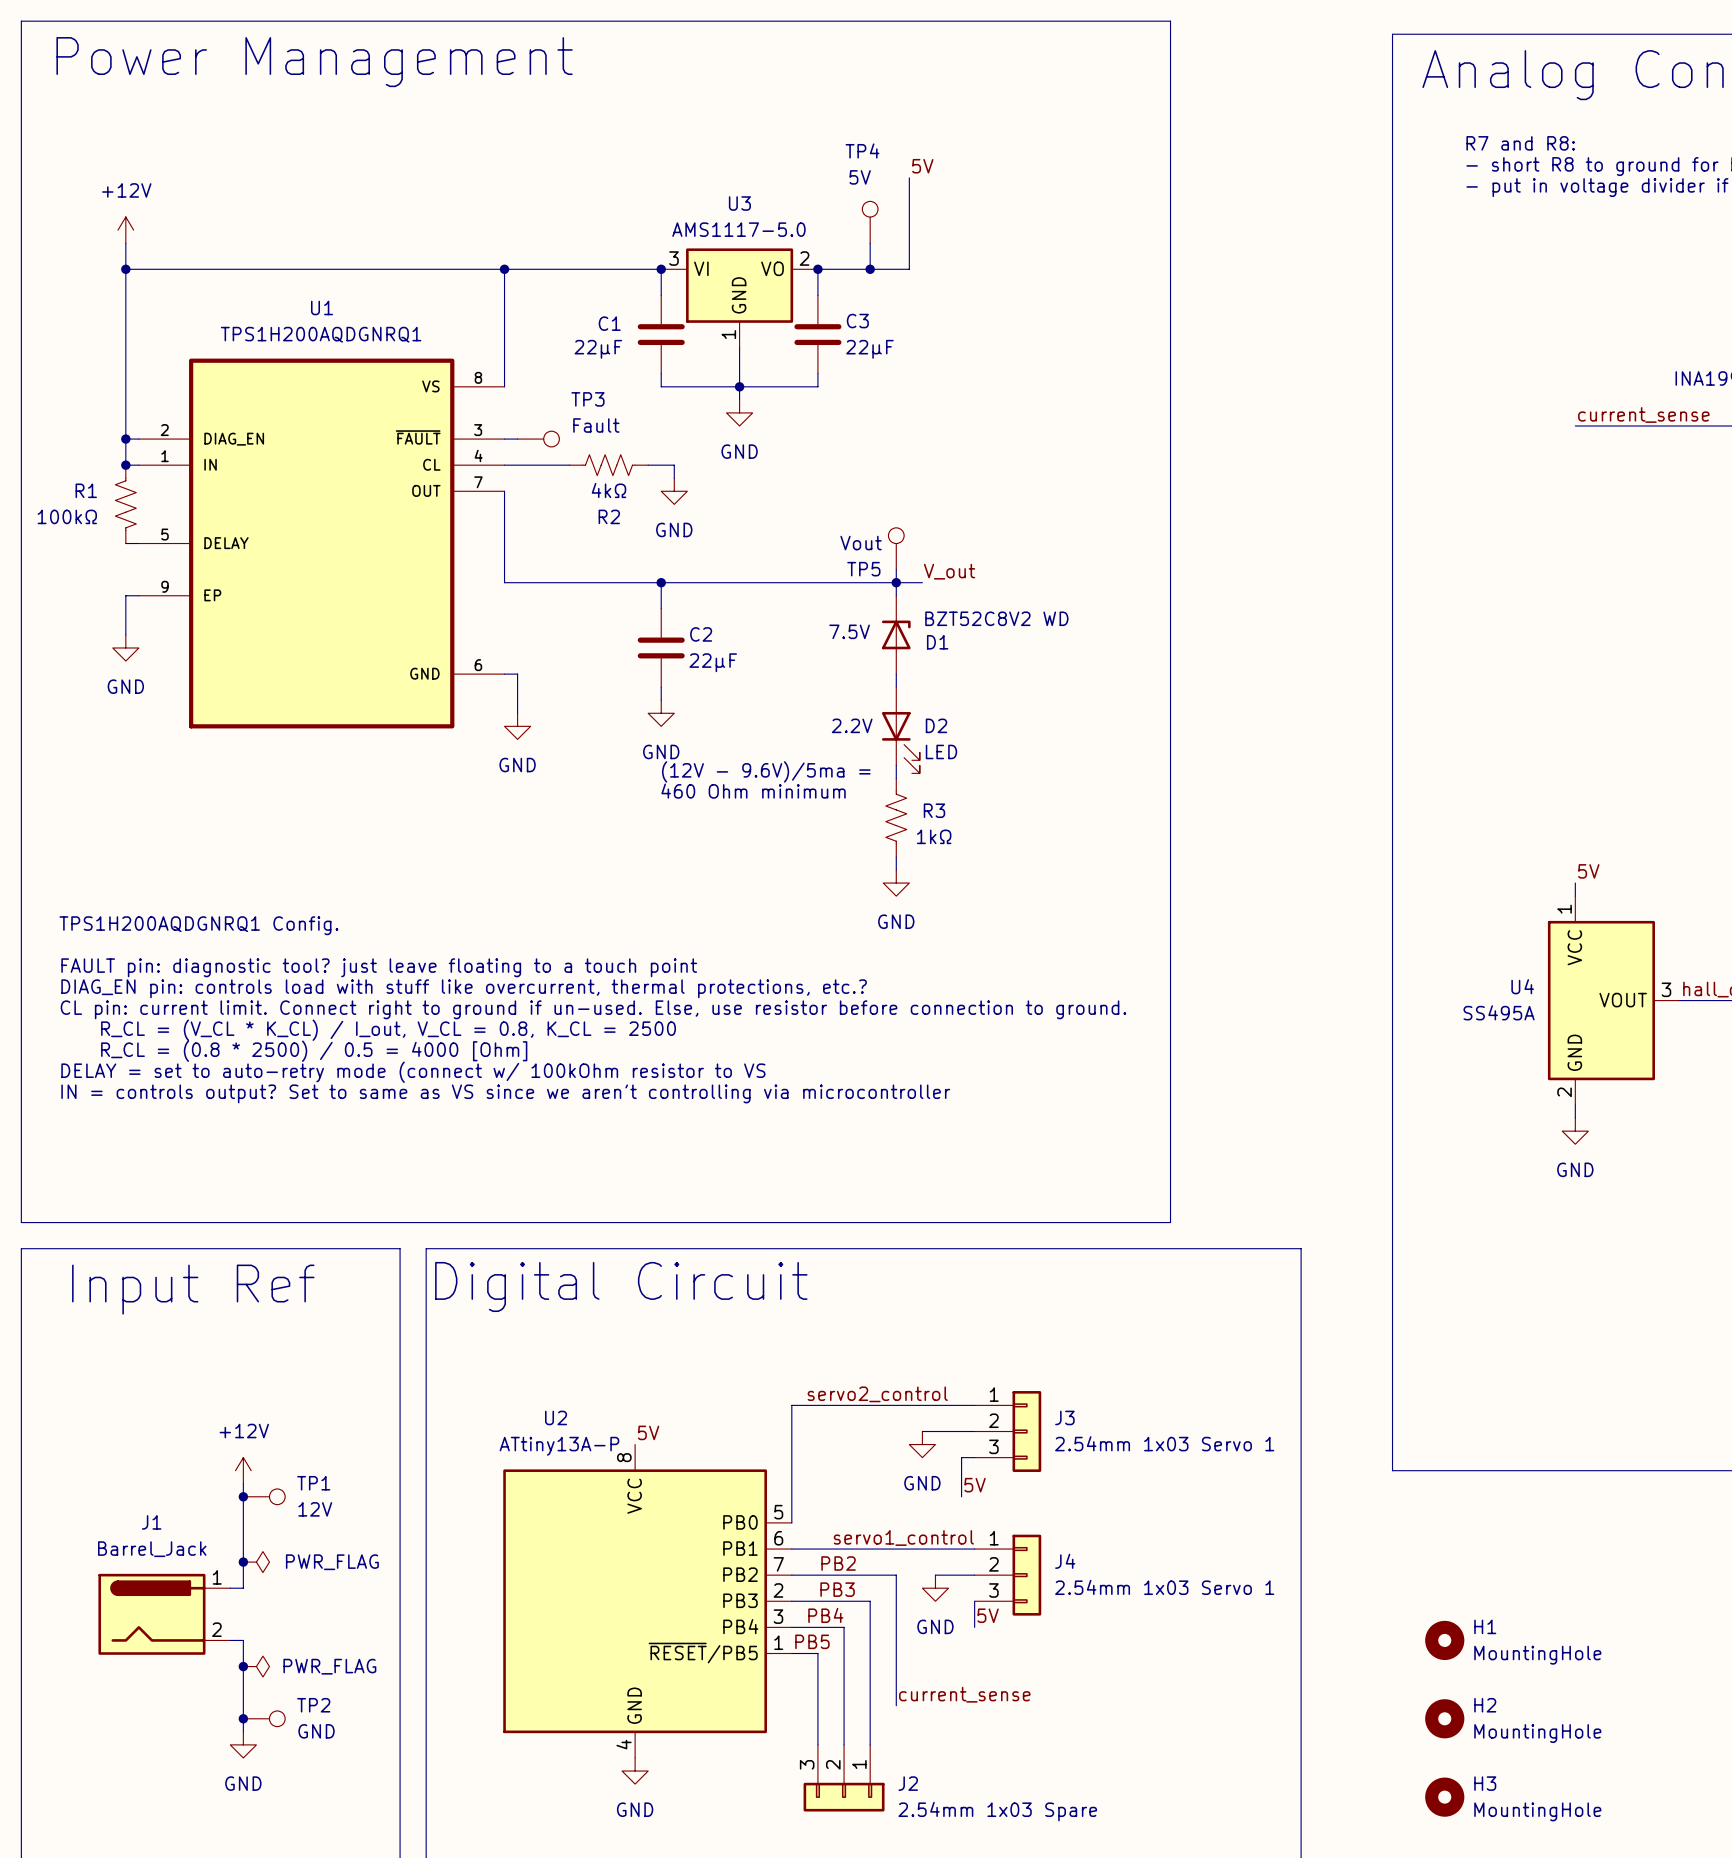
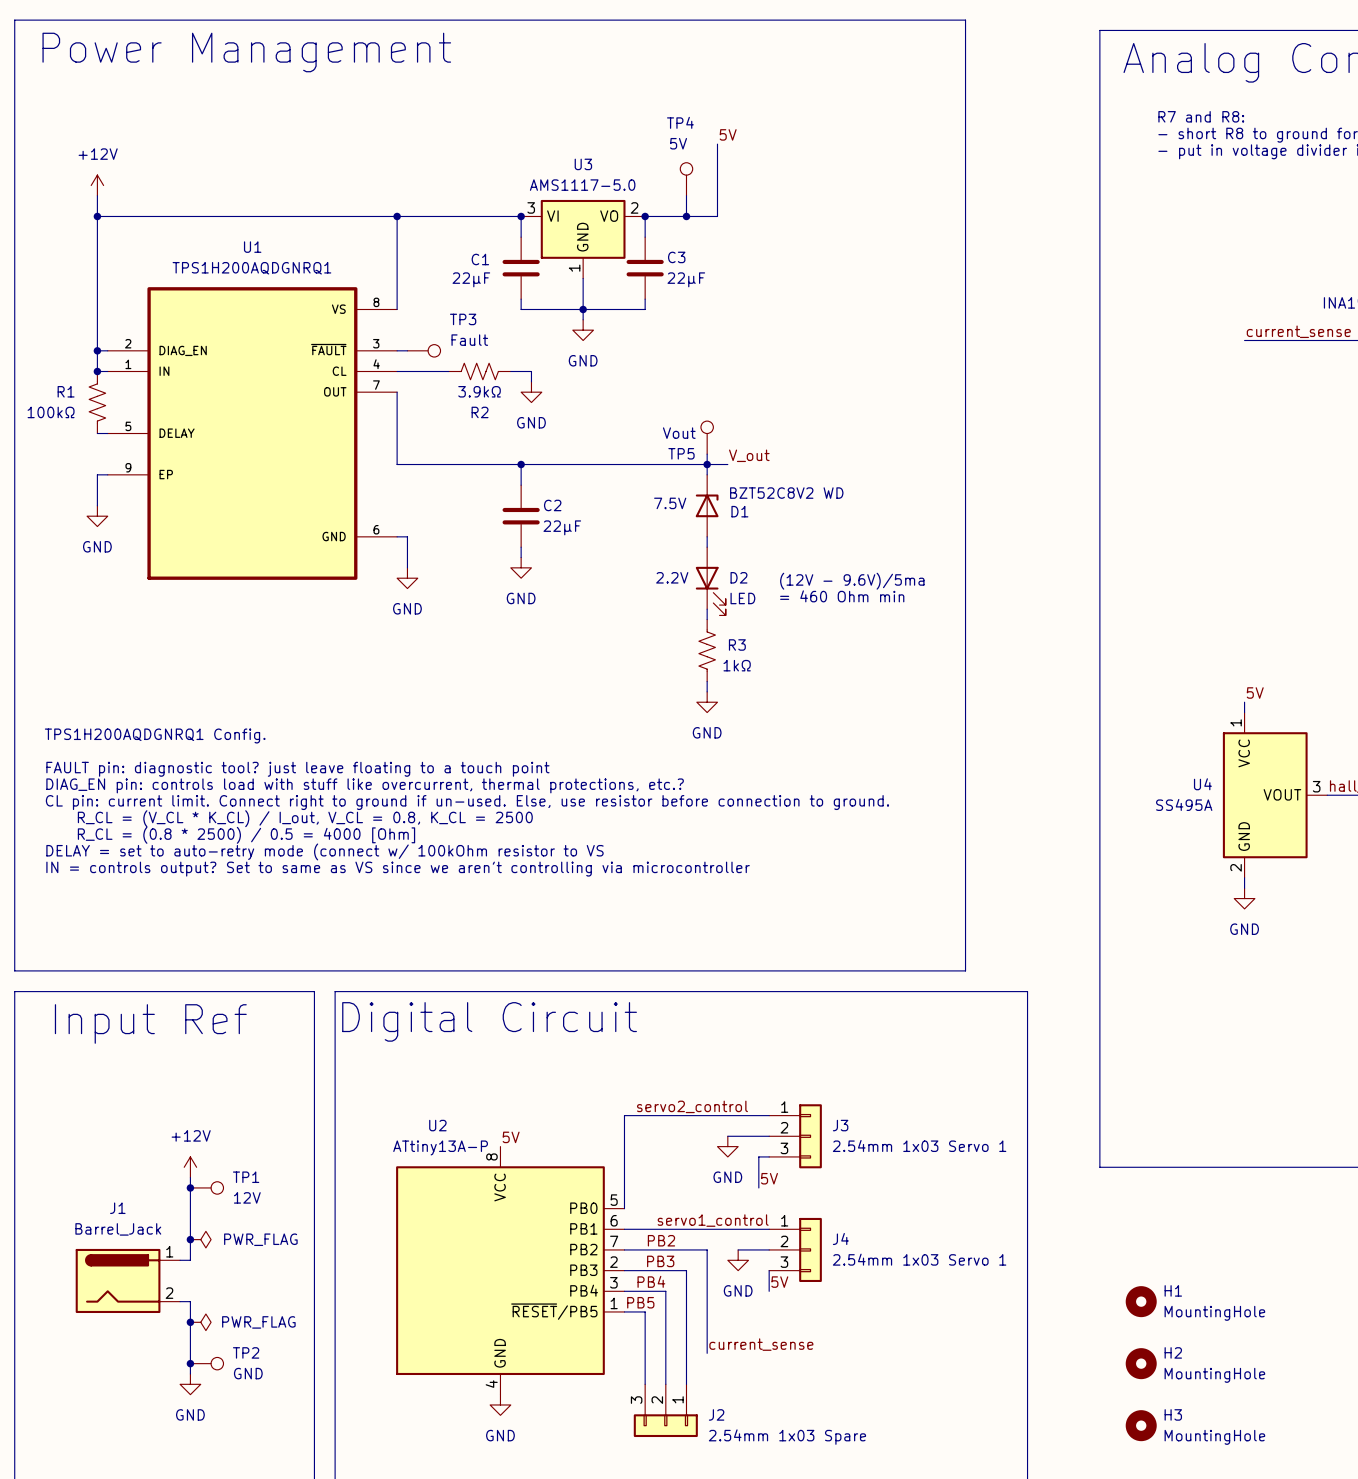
line: (1170, 21) (1170, 1222) -> (924, 20) (965, 20) (965, 970) (924, 970)
R2 value: 4kΩ (609, 490) -> 3.9kΩ (479, 391)
text: none -> (12V - 9.6V)/5ma (852, 581)
text: none -> = 460 Ohm min (842, 596)
text: (12V - 9.6V)/5ma = (766, 771) -> none
text: 460 Ohm minimum (753, 791) -> none

